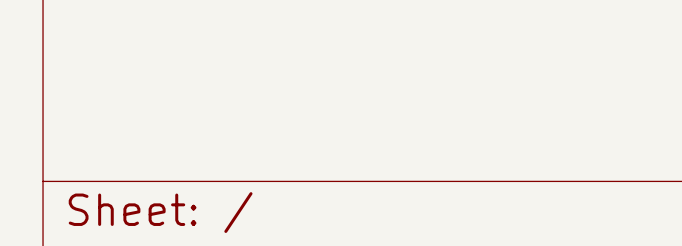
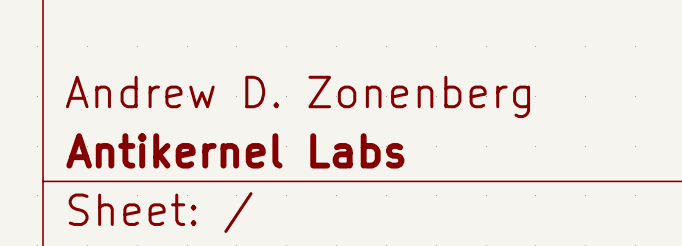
title block: none -> Andrew D. Zonenberg (297, 96)
title block: none -> Antikernel Labs (235, 150)

